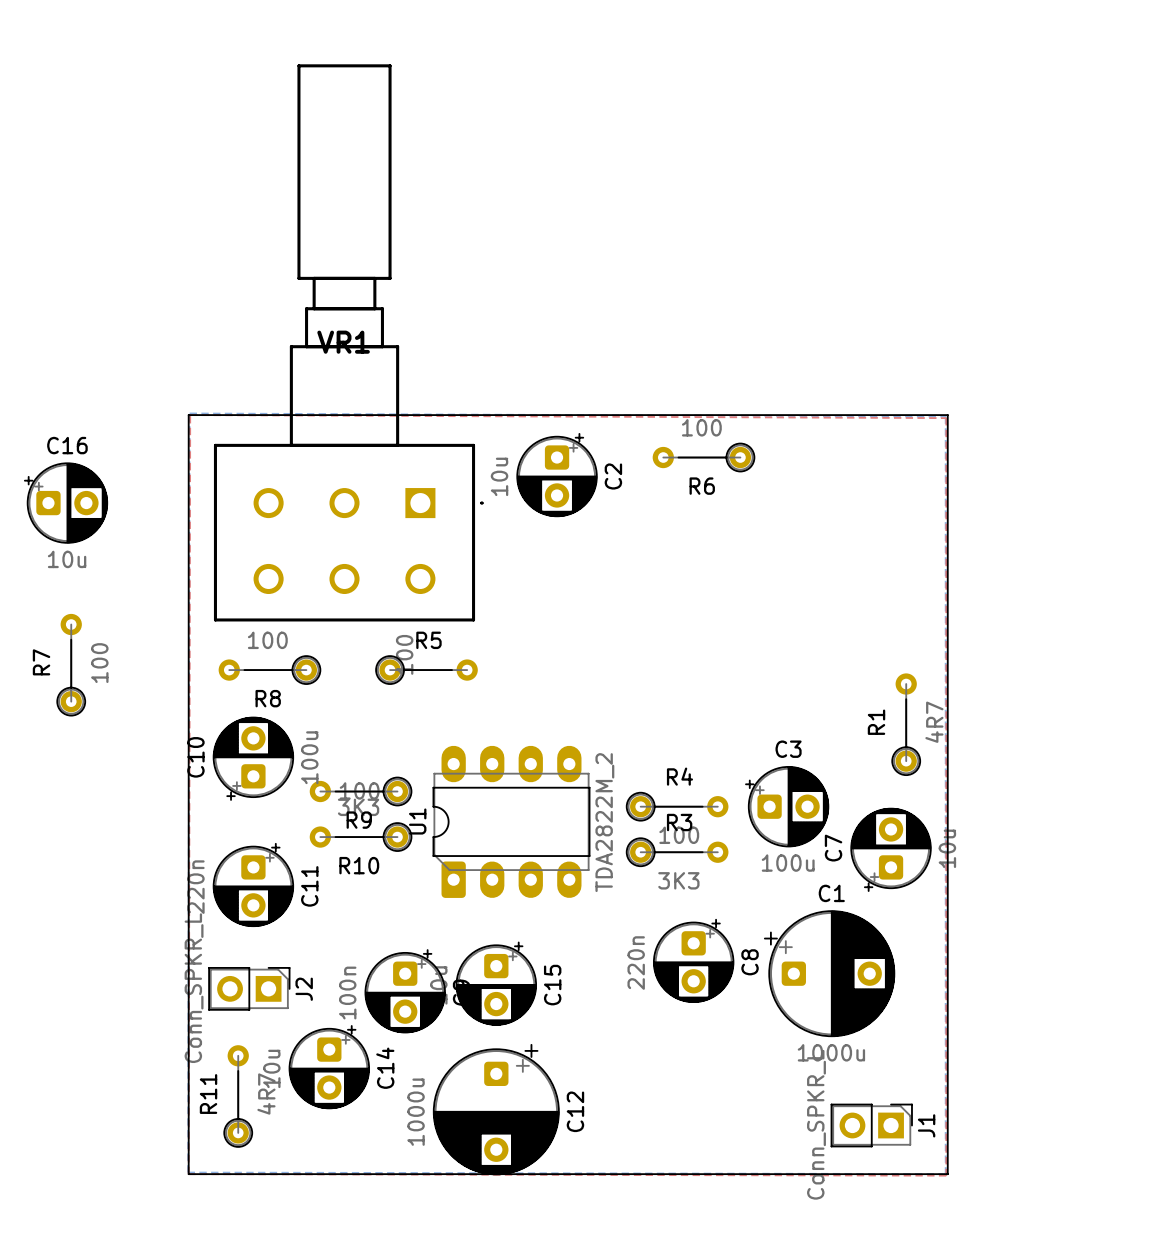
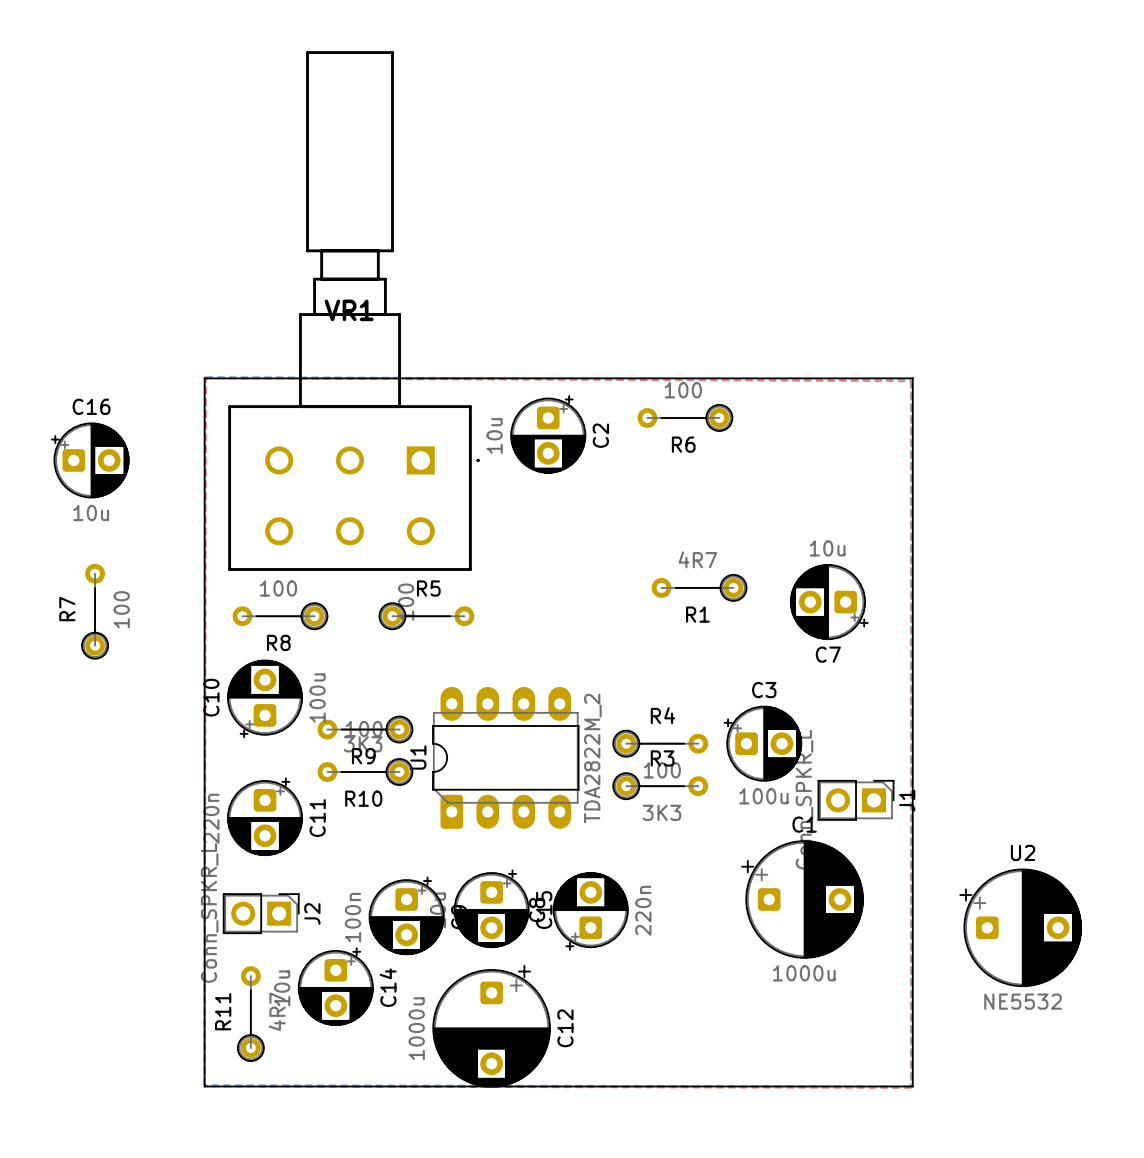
R1 rotation: 0° (906, 724) -> 90° counterclockwise (699, 587)
R1 position: (906, 724) -> (699, 587)
C7 rotation: 0° (891, 849) -> 90° counterclockwise (829, 602)
C7 position: (891, 849) -> (829, 602)
C8 rotation: 0° (693, 960) -> 180° (590, 911)
C8 position: (693, 960) -> (590, 911)
U2: none -> NE5532 (1020, 927)
J1 position: (871, 1125) -> (856, 800)

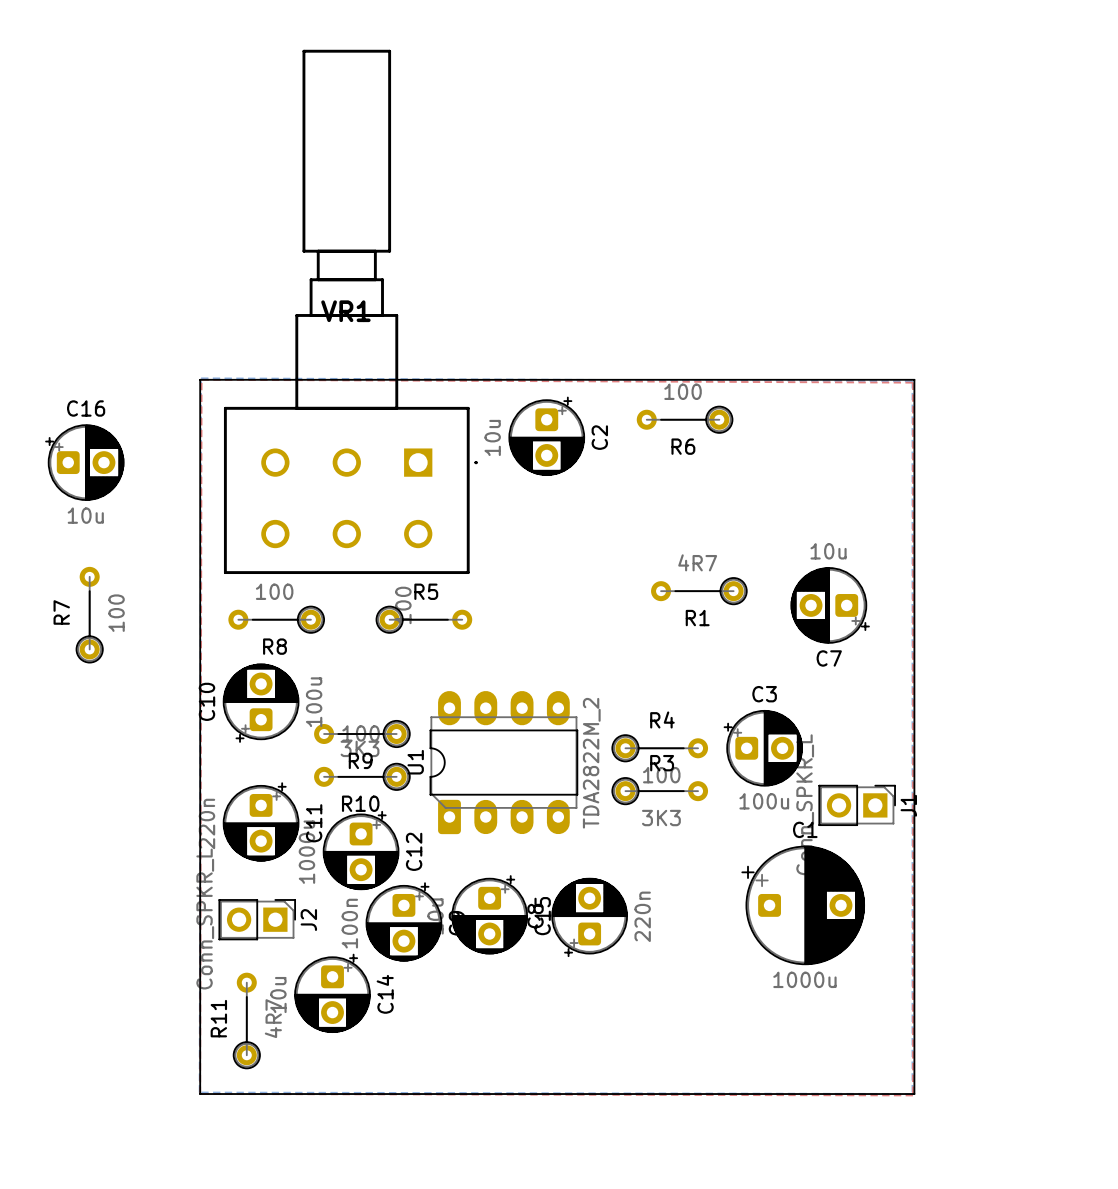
U2: NE5532 (1020, 927) -> none
C12 footprint: [432, 965, 551, 1088] -> [322, 810, 400, 891]

